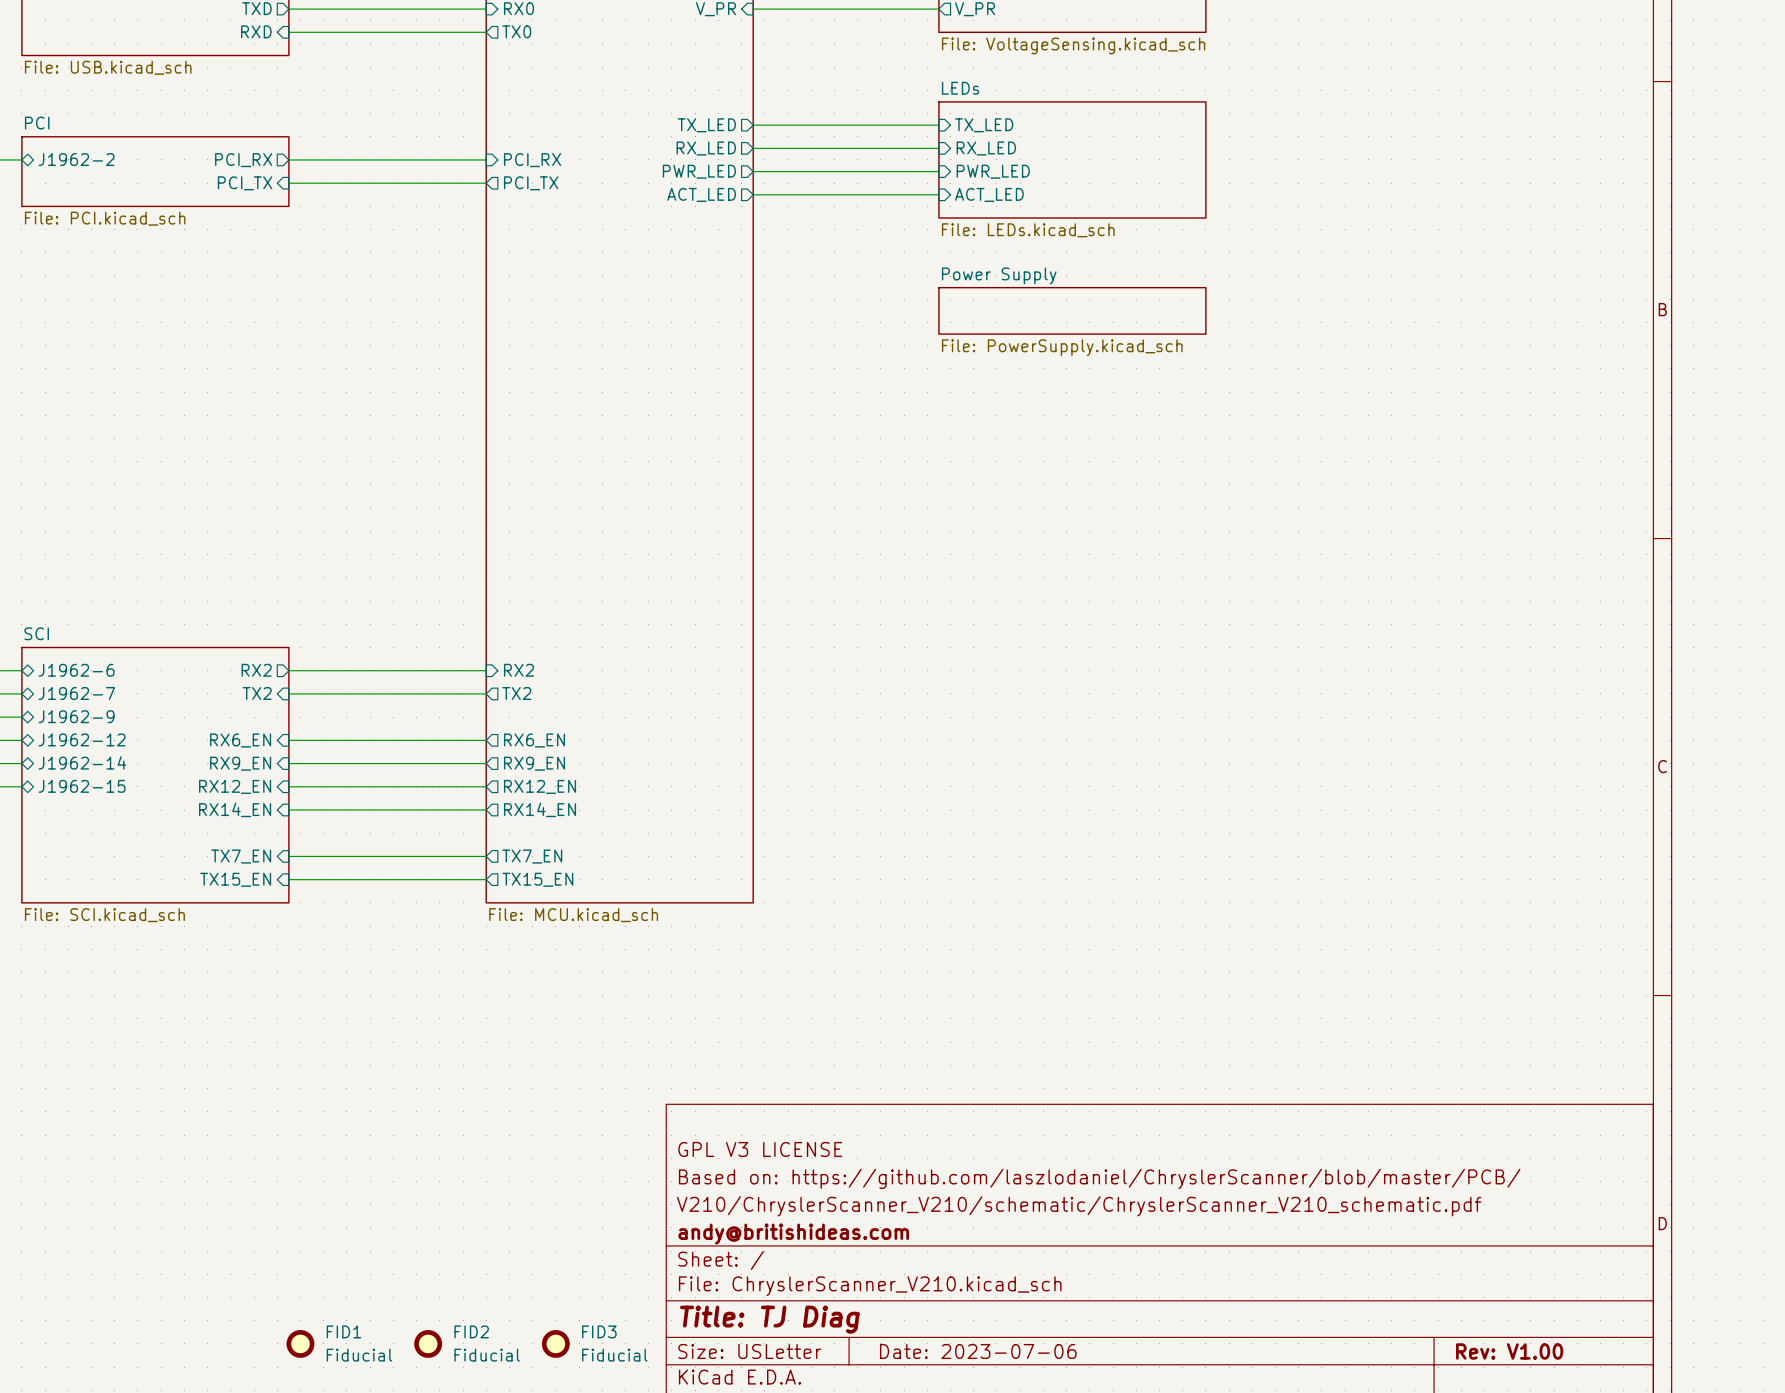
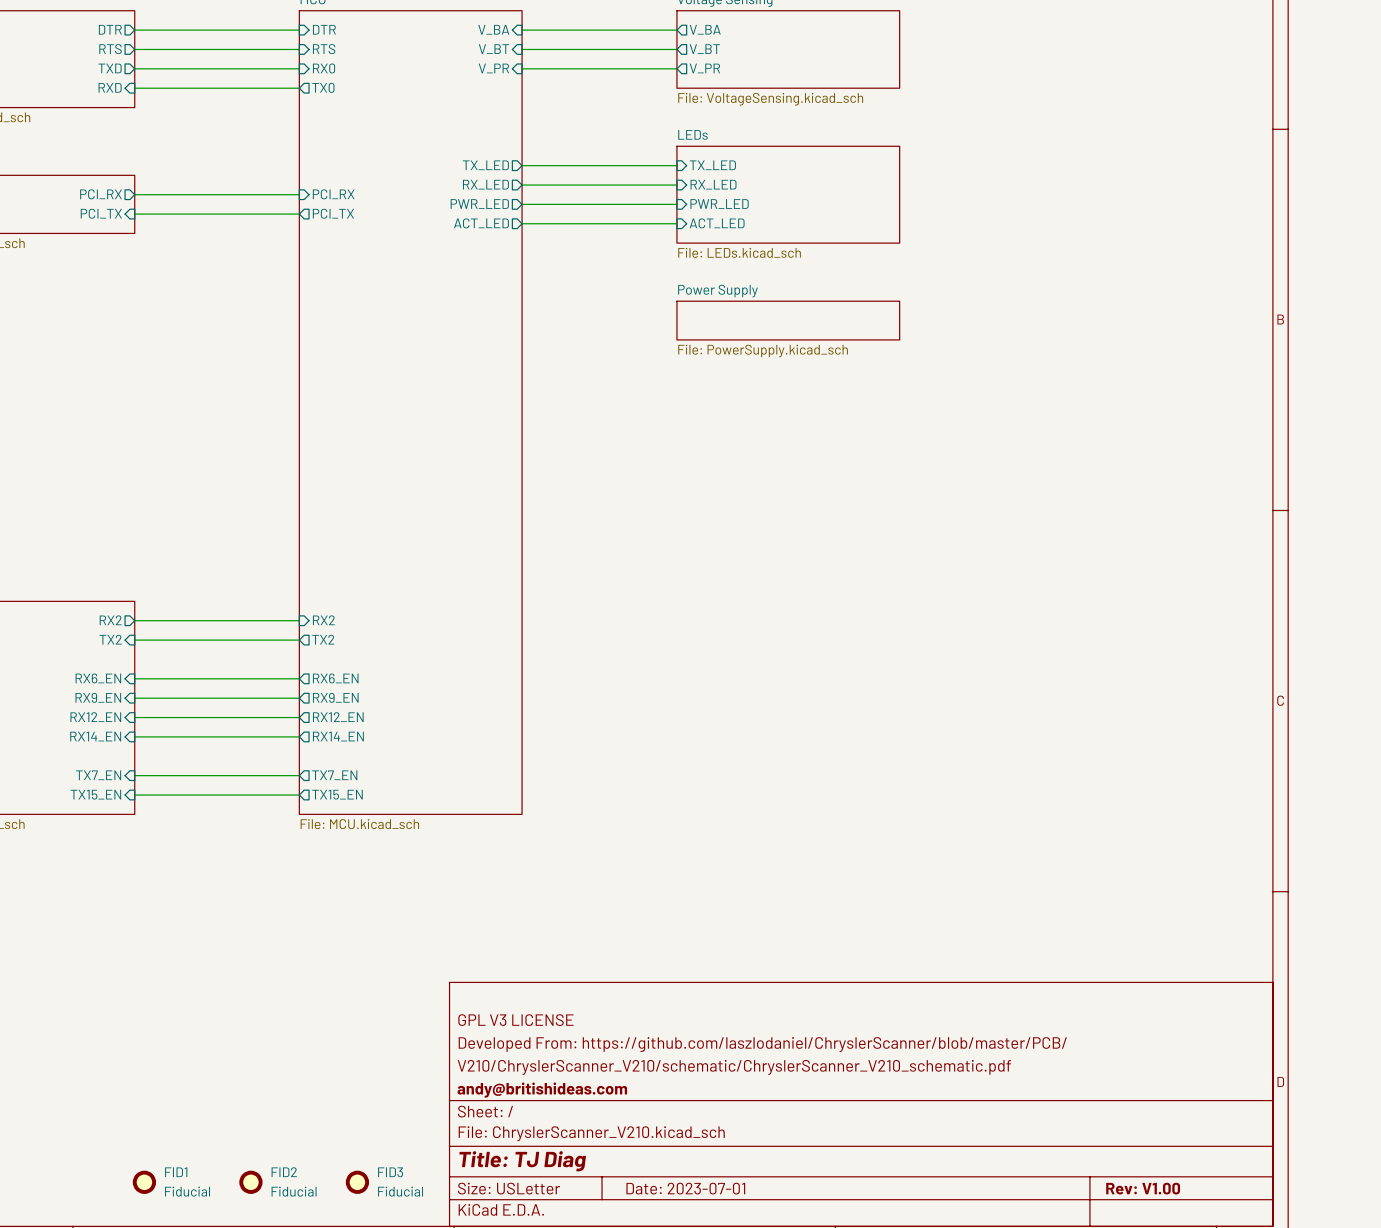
title block: Based on: https://github.com/laszlodaniel/ChryslerScanner/blob/master/PCB/ (1099, 1178) -> Developed From: https://github.com/laszlodaniel/ChryslerScanner/blob/master/PCB/ (762, 1044)
title block: Date: 2023-07-06 (978, 1351) -> Date: 2023-07-01 (685, 1188)

